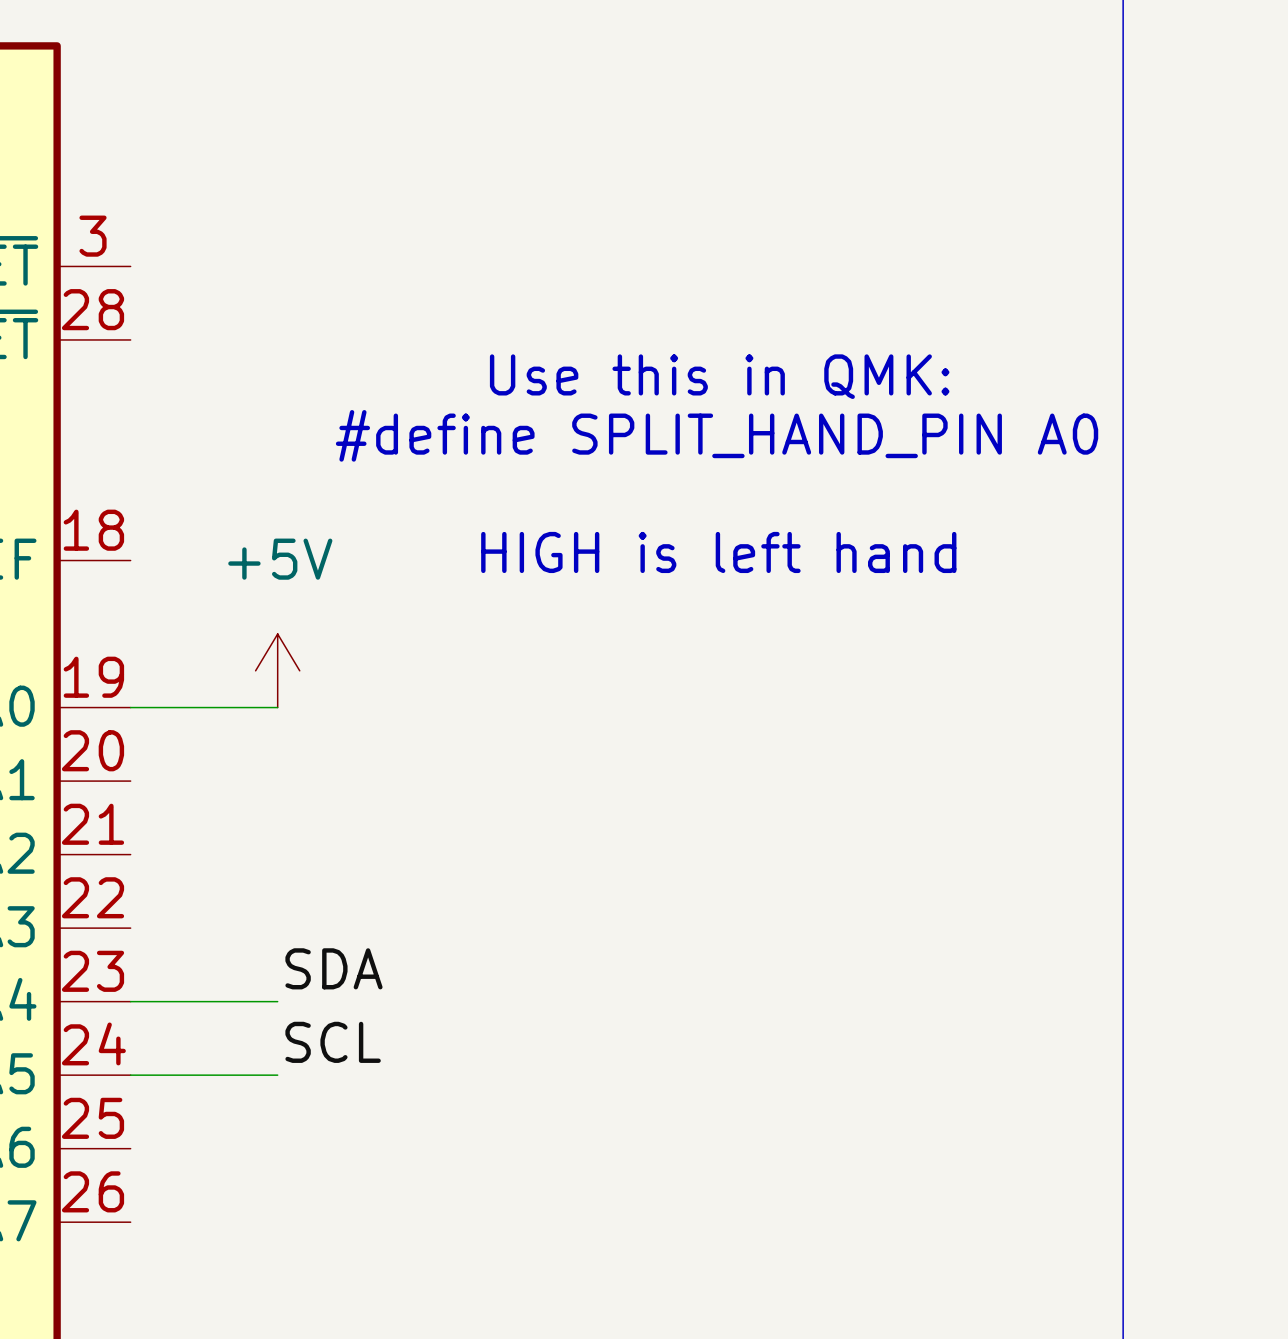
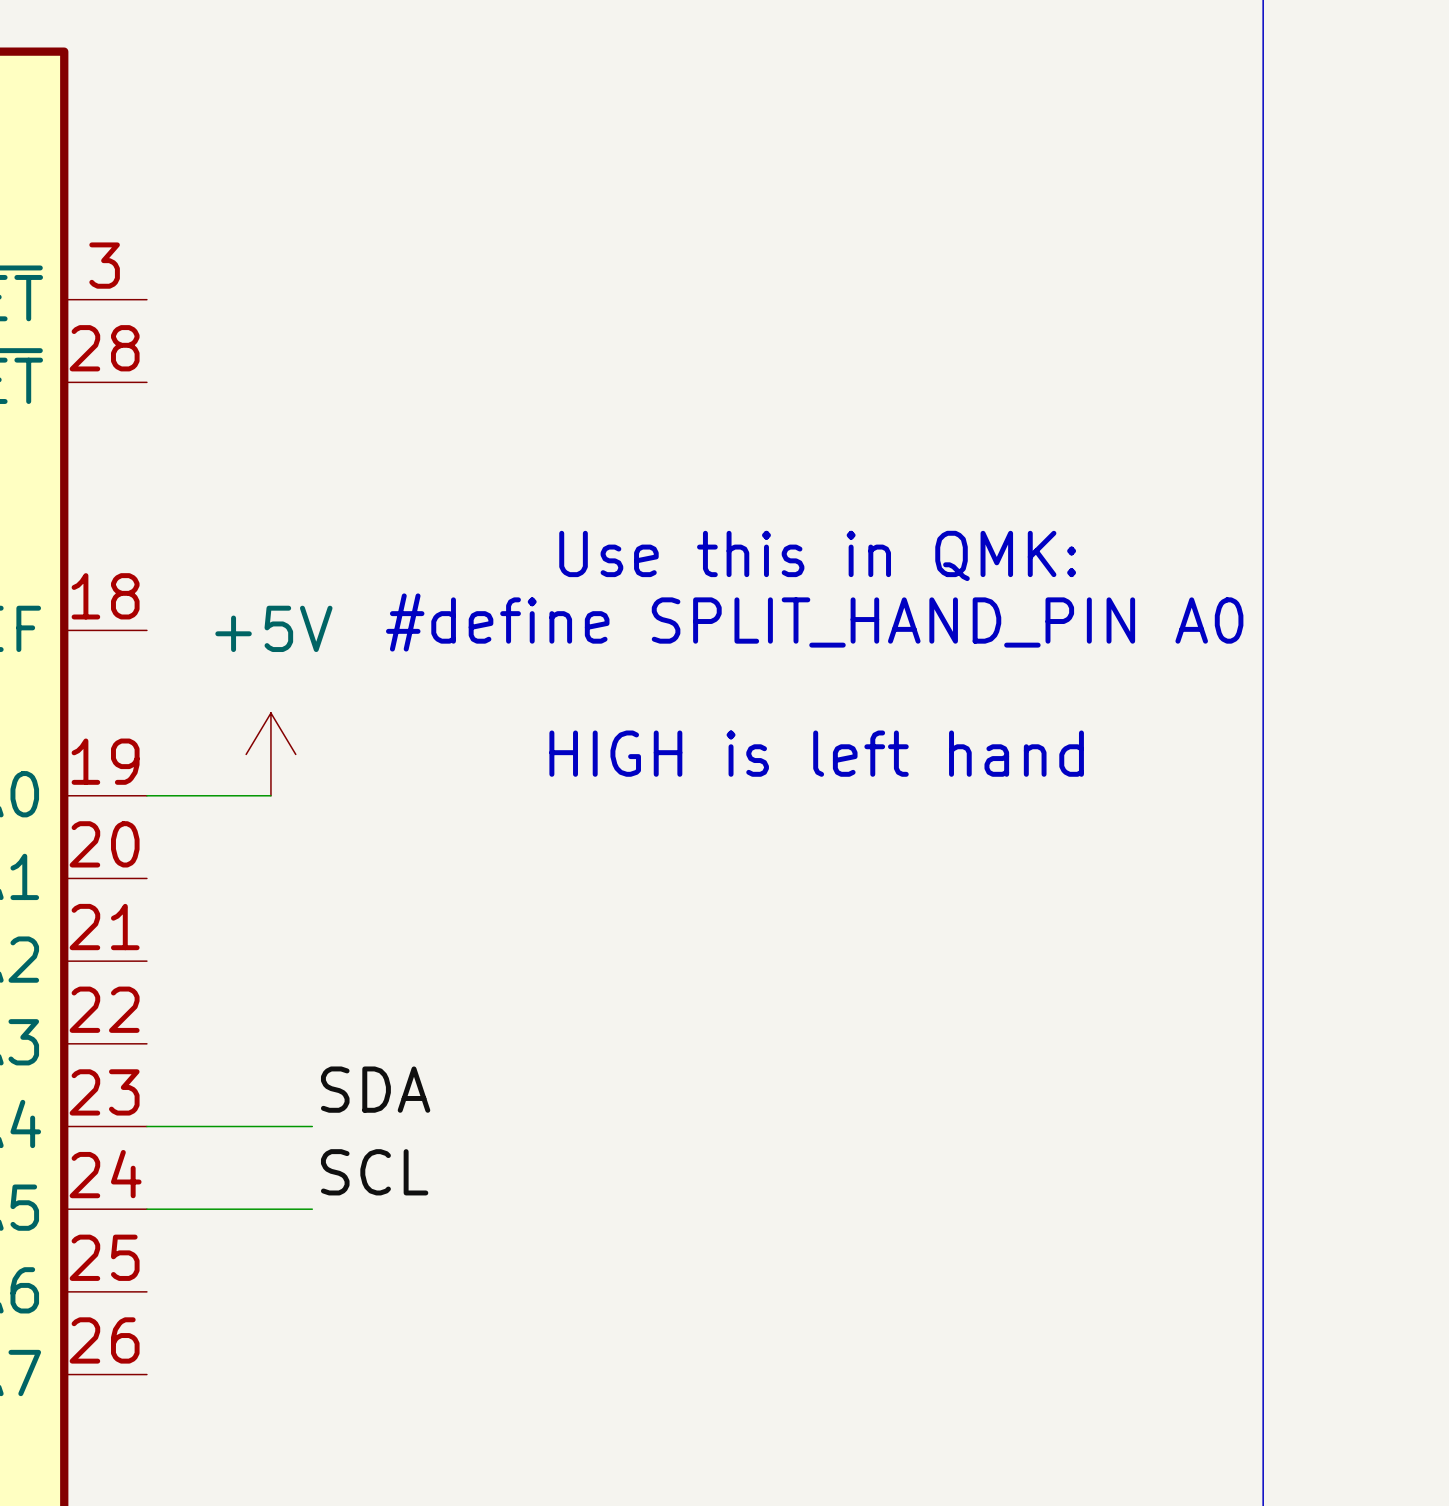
text position: Use this in QMK: (719, 376) -> Use this in QMK: (817, 555)
text position: #define SPLIT_HAND_PIN A0 (717, 435) -> #define SPLIT_HAND_PIN A0 (814, 622)
text position: HIGH is left hand (718, 552) -> HIGH is left hand (816, 753)
power symbol position: +5V (277, 670) -> +5V (270, 754)
wire: (240, 707) (277, 707) -> none

